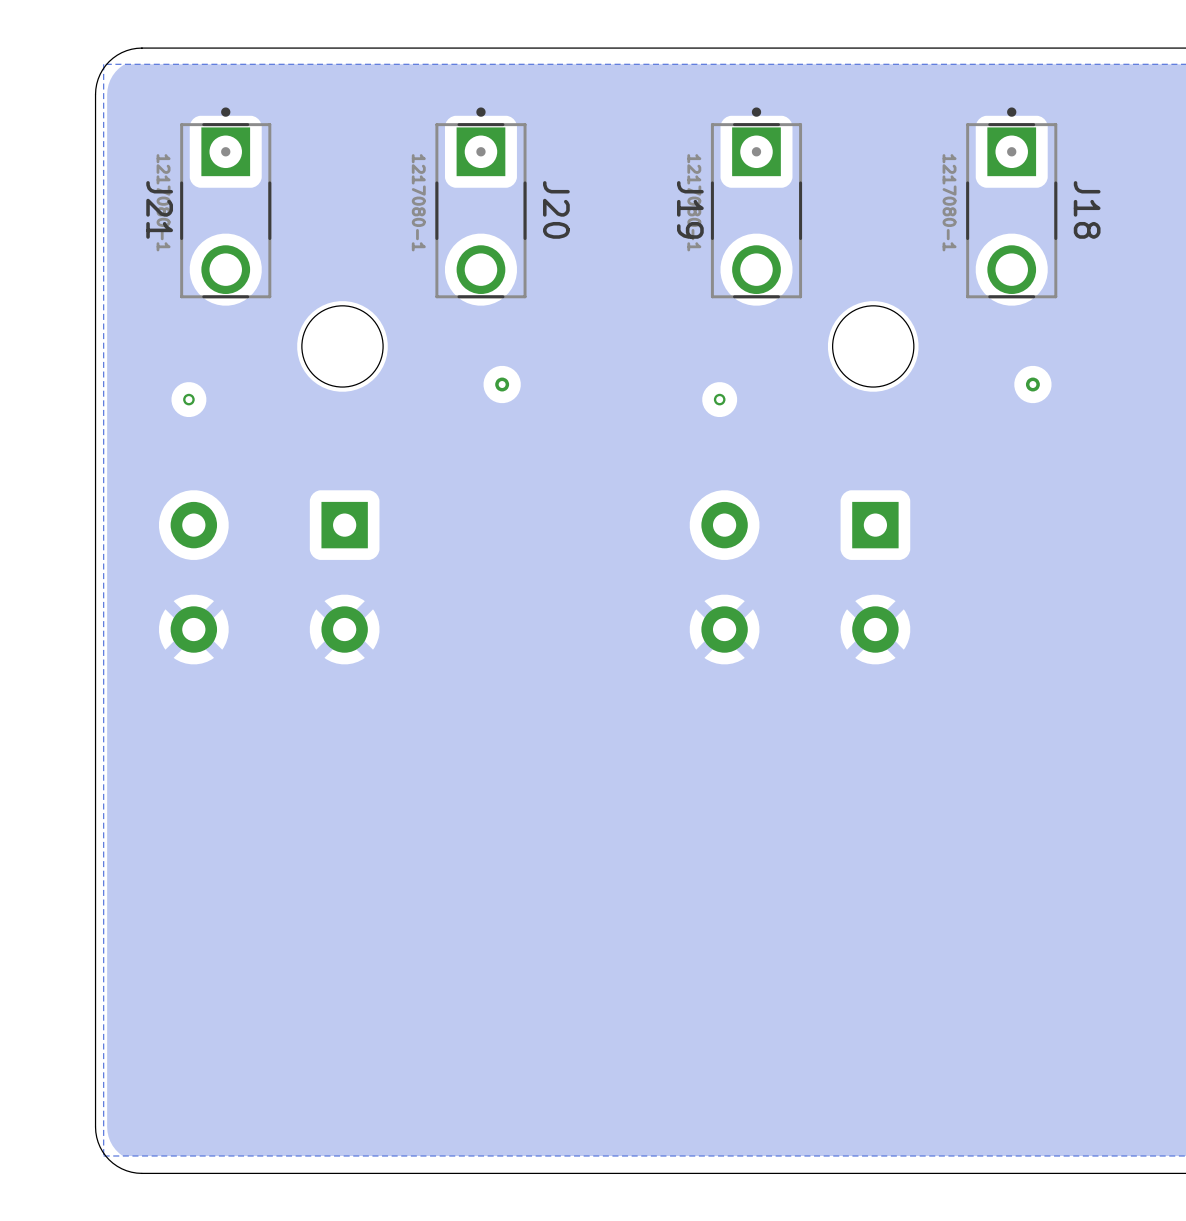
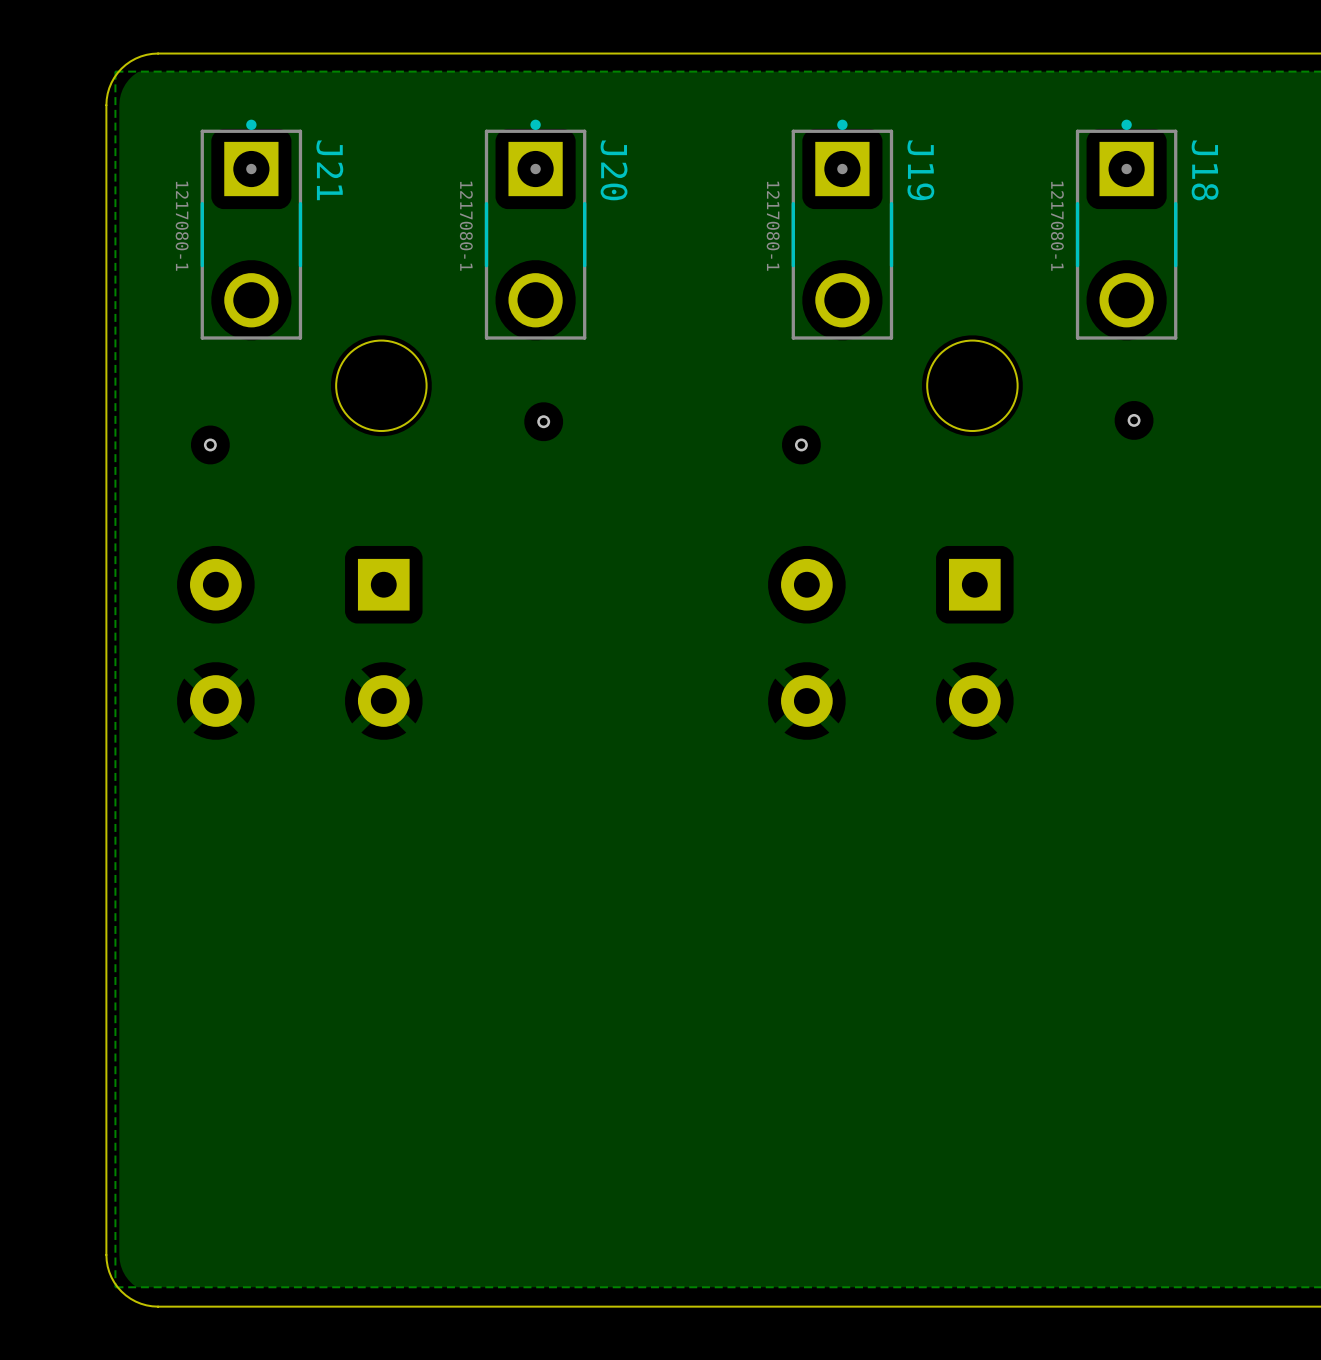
J21 footprint: [180, 107, 272, 299] -> [200, 119, 303, 340]
J20 footprint: [435, 107, 527, 299] -> [484, 119, 587, 340]
J19 footprint: [710, 107, 803, 299] -> [791, 119, 894, 340]
J18 footprint: [966, 107, 1058, 299] -> [1075, 119, 1178, 340]
J21 name position: J21 (159, 209) -> J21 (329, 170)
J20 name position: J20 (556, 209) -> J20 (614, 170)
J19 name position: J19 (690, 209) -> J19 (920, 170)
J18 name position: J18 (1087, 209) -> J18 (1205, 170)
via: none -> (1134, 420)
via: none -> (543, 421)
via: (502, 384) -> none
via: (1032, 384) -> none

